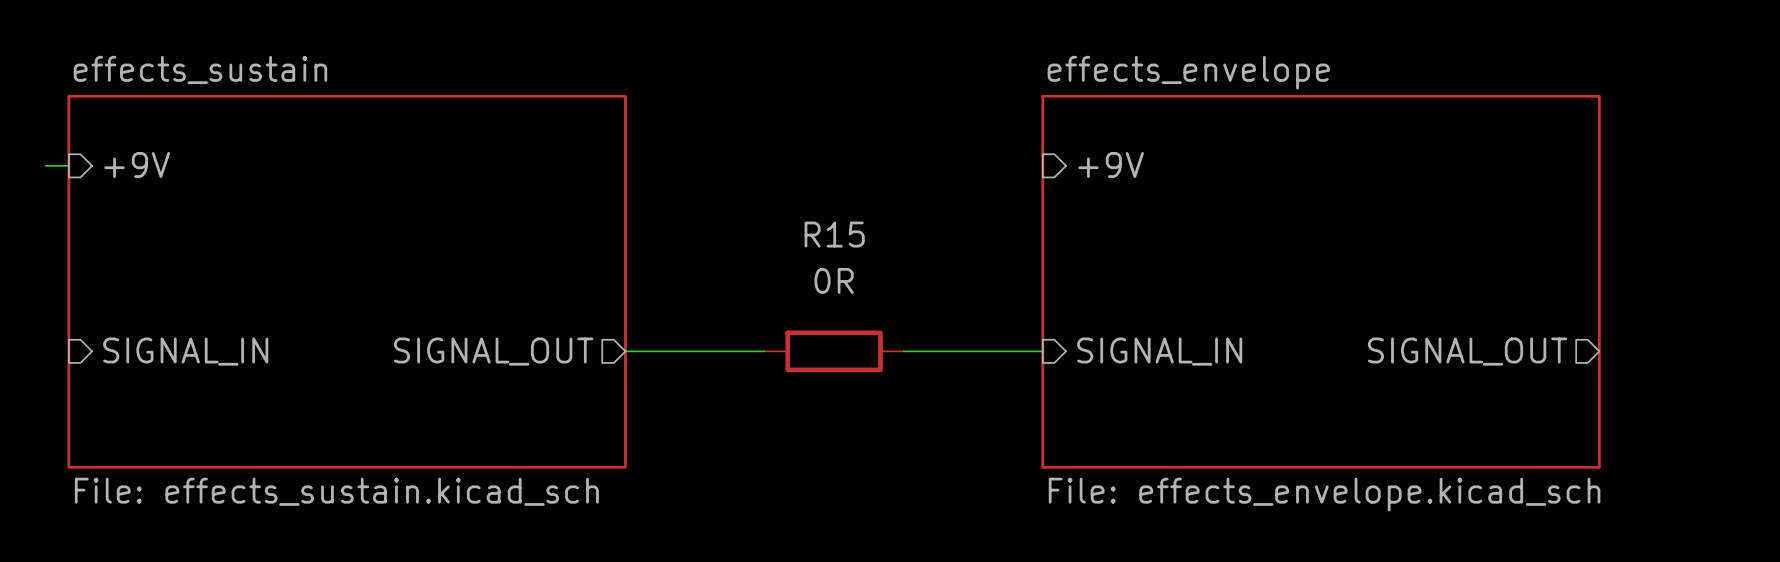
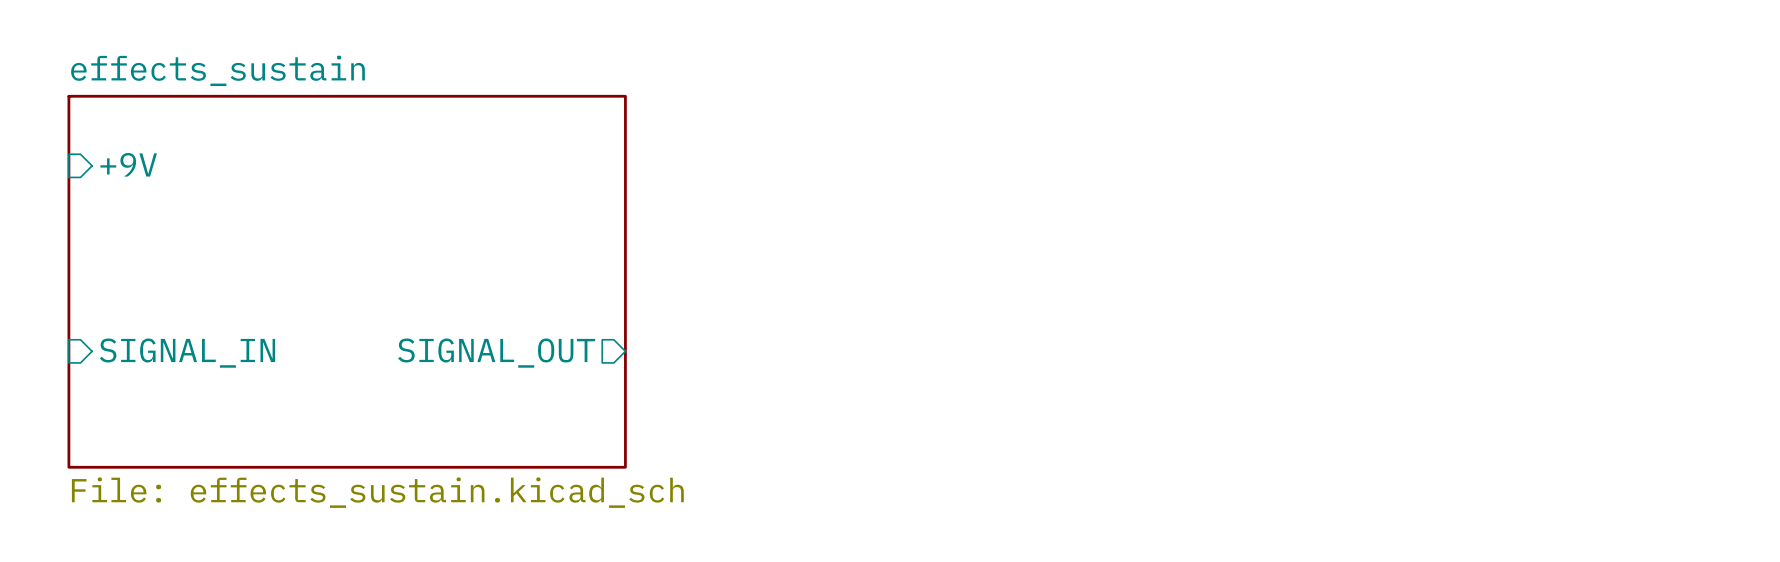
sheet pin: +9V (1111, 164) -> none
wire: (45, 165) (68, 165) -> none
sheet effects_envelope: File: effects_envelope.kicad_sch (1321, 281) -> none
wire: (625, 351) (764, 351) -> none
R15: 0R (834, 351) -> none
wire: (903, 351) (1042, 351) -> none
sheet pin: SIGNAL_IN (1159, 351) -> none
sheet pin: SIGNAL_OUT (1467, 351) -> none

